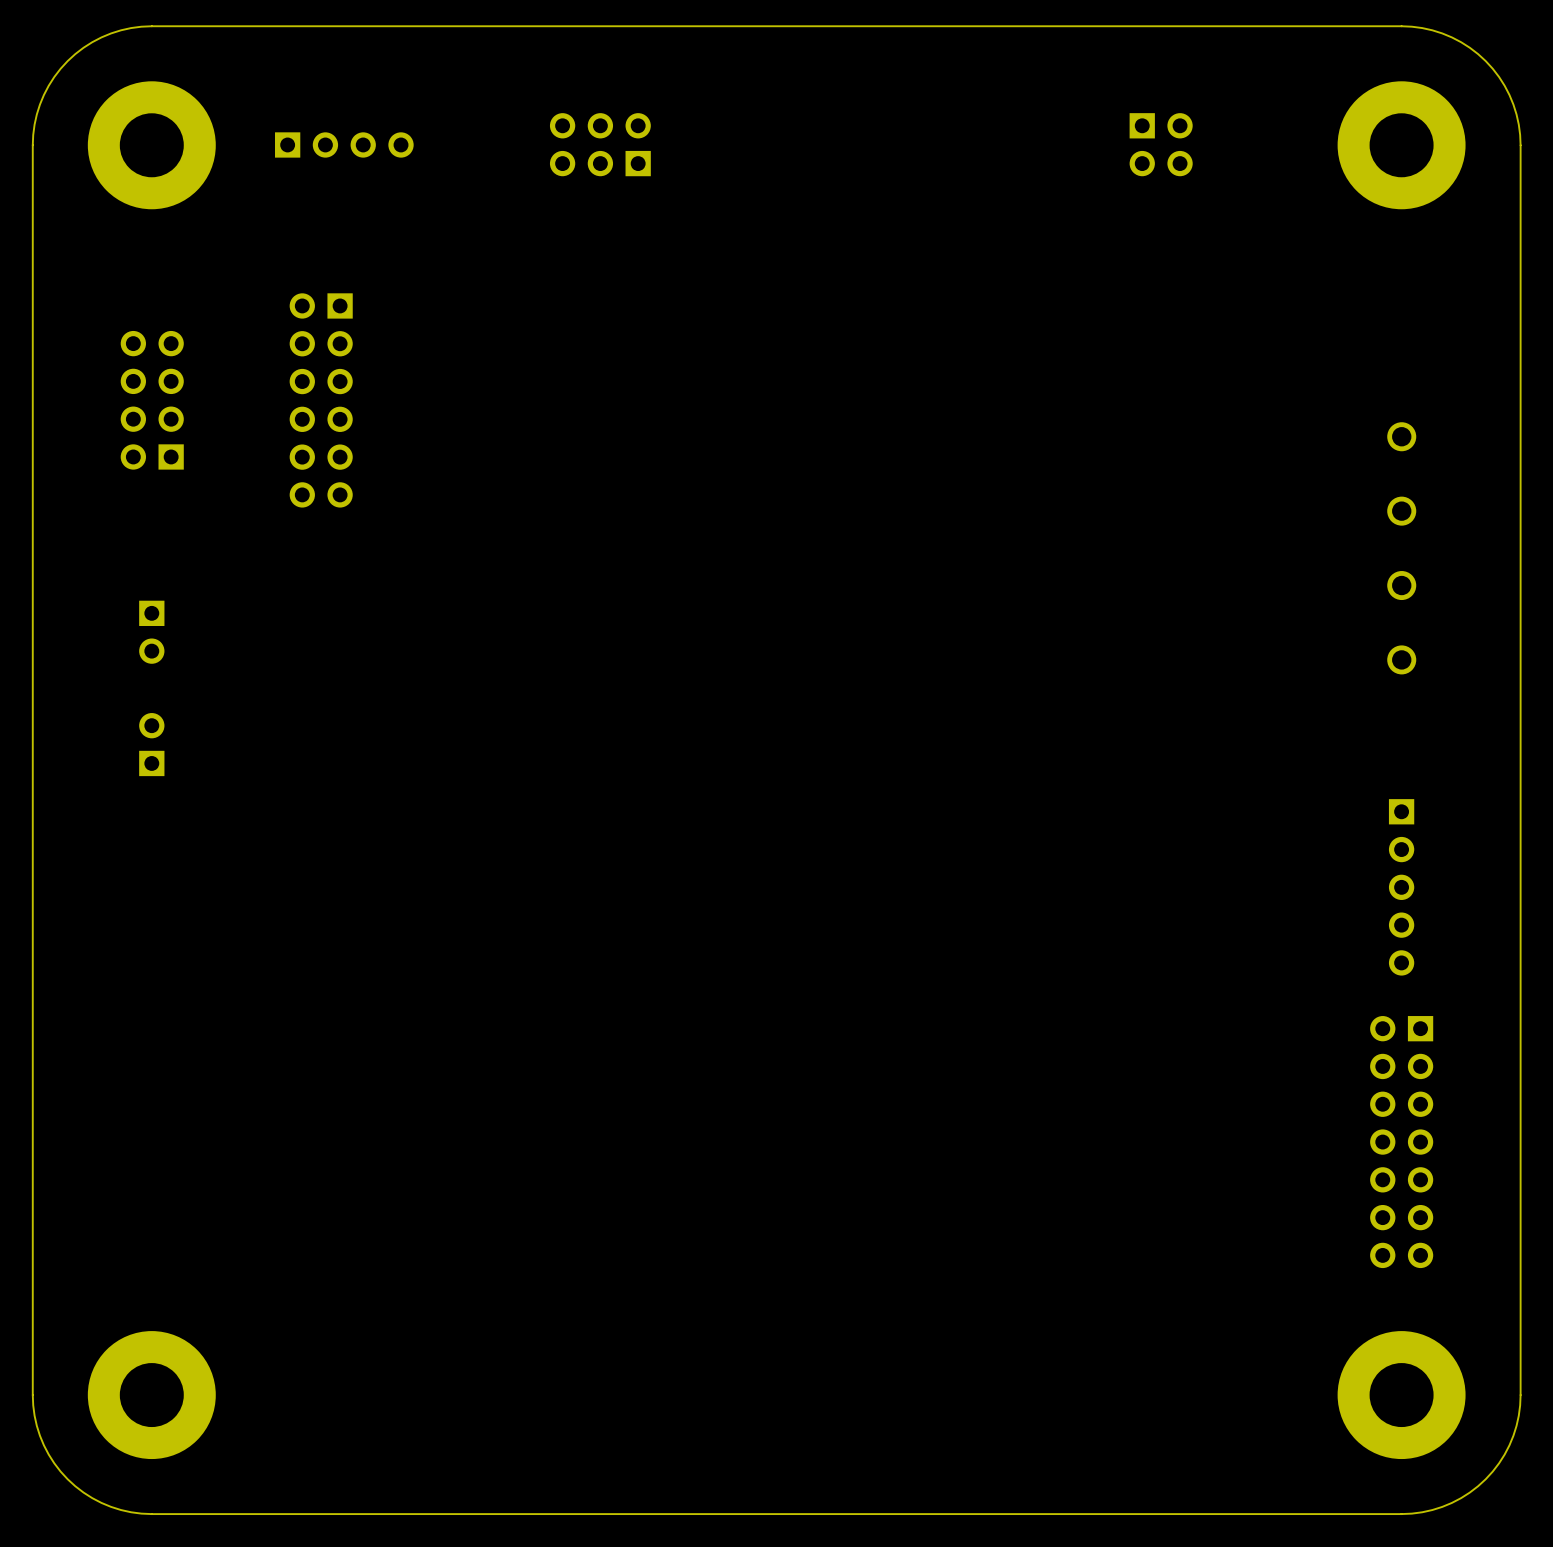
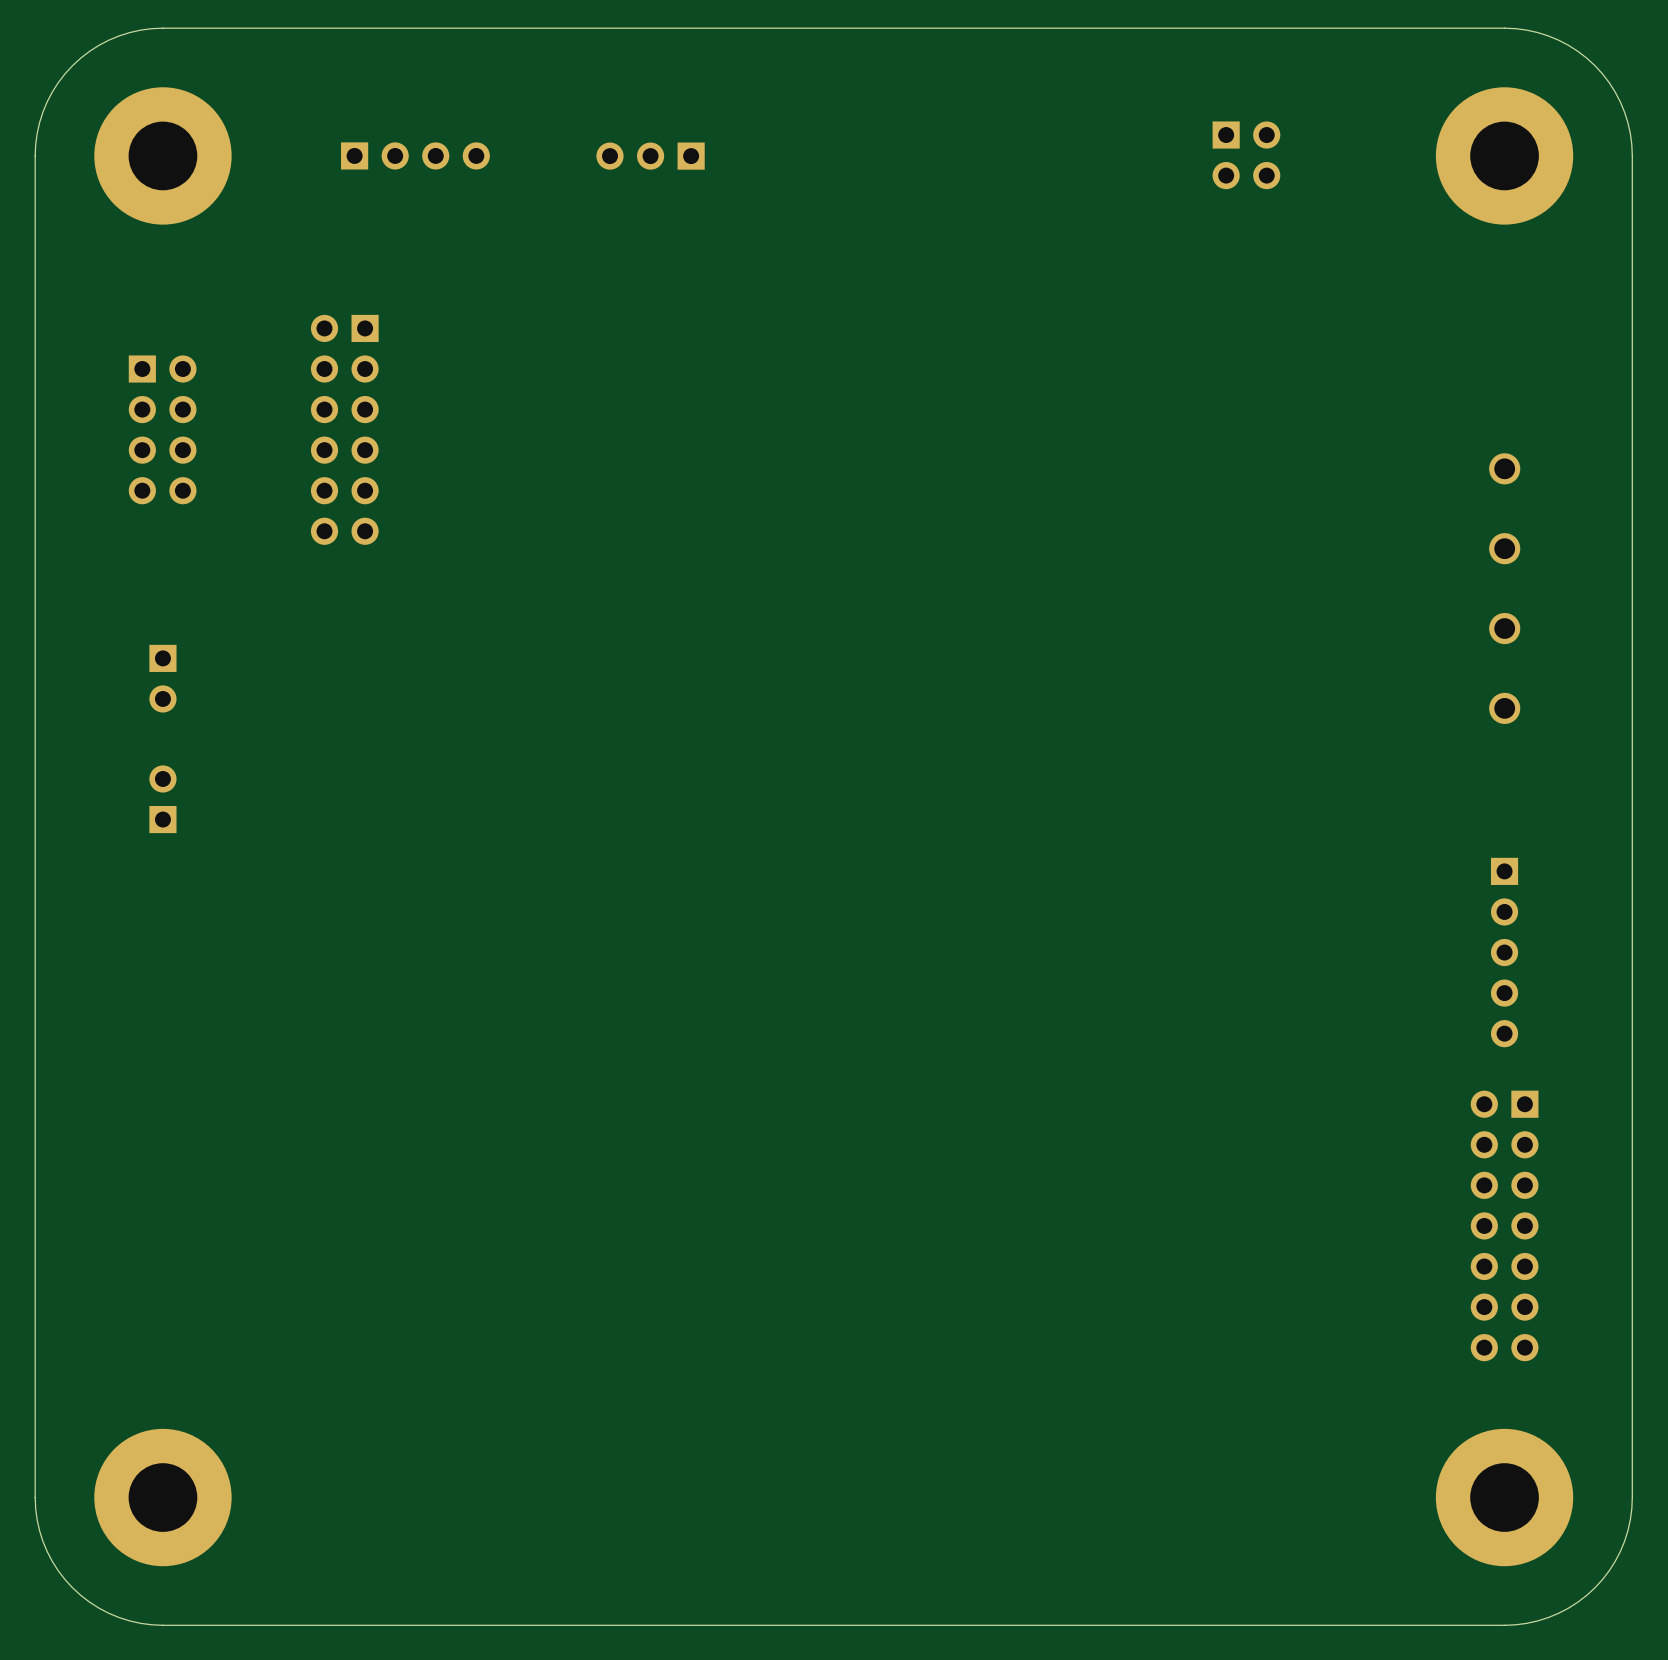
part footprint: [549, 113, 651, 177] -> [596, 142, 705, 170]
part position: (344, 144) -> (415, 155)
part rotation: 0° (152, 400) -> 180° (162, 429)

